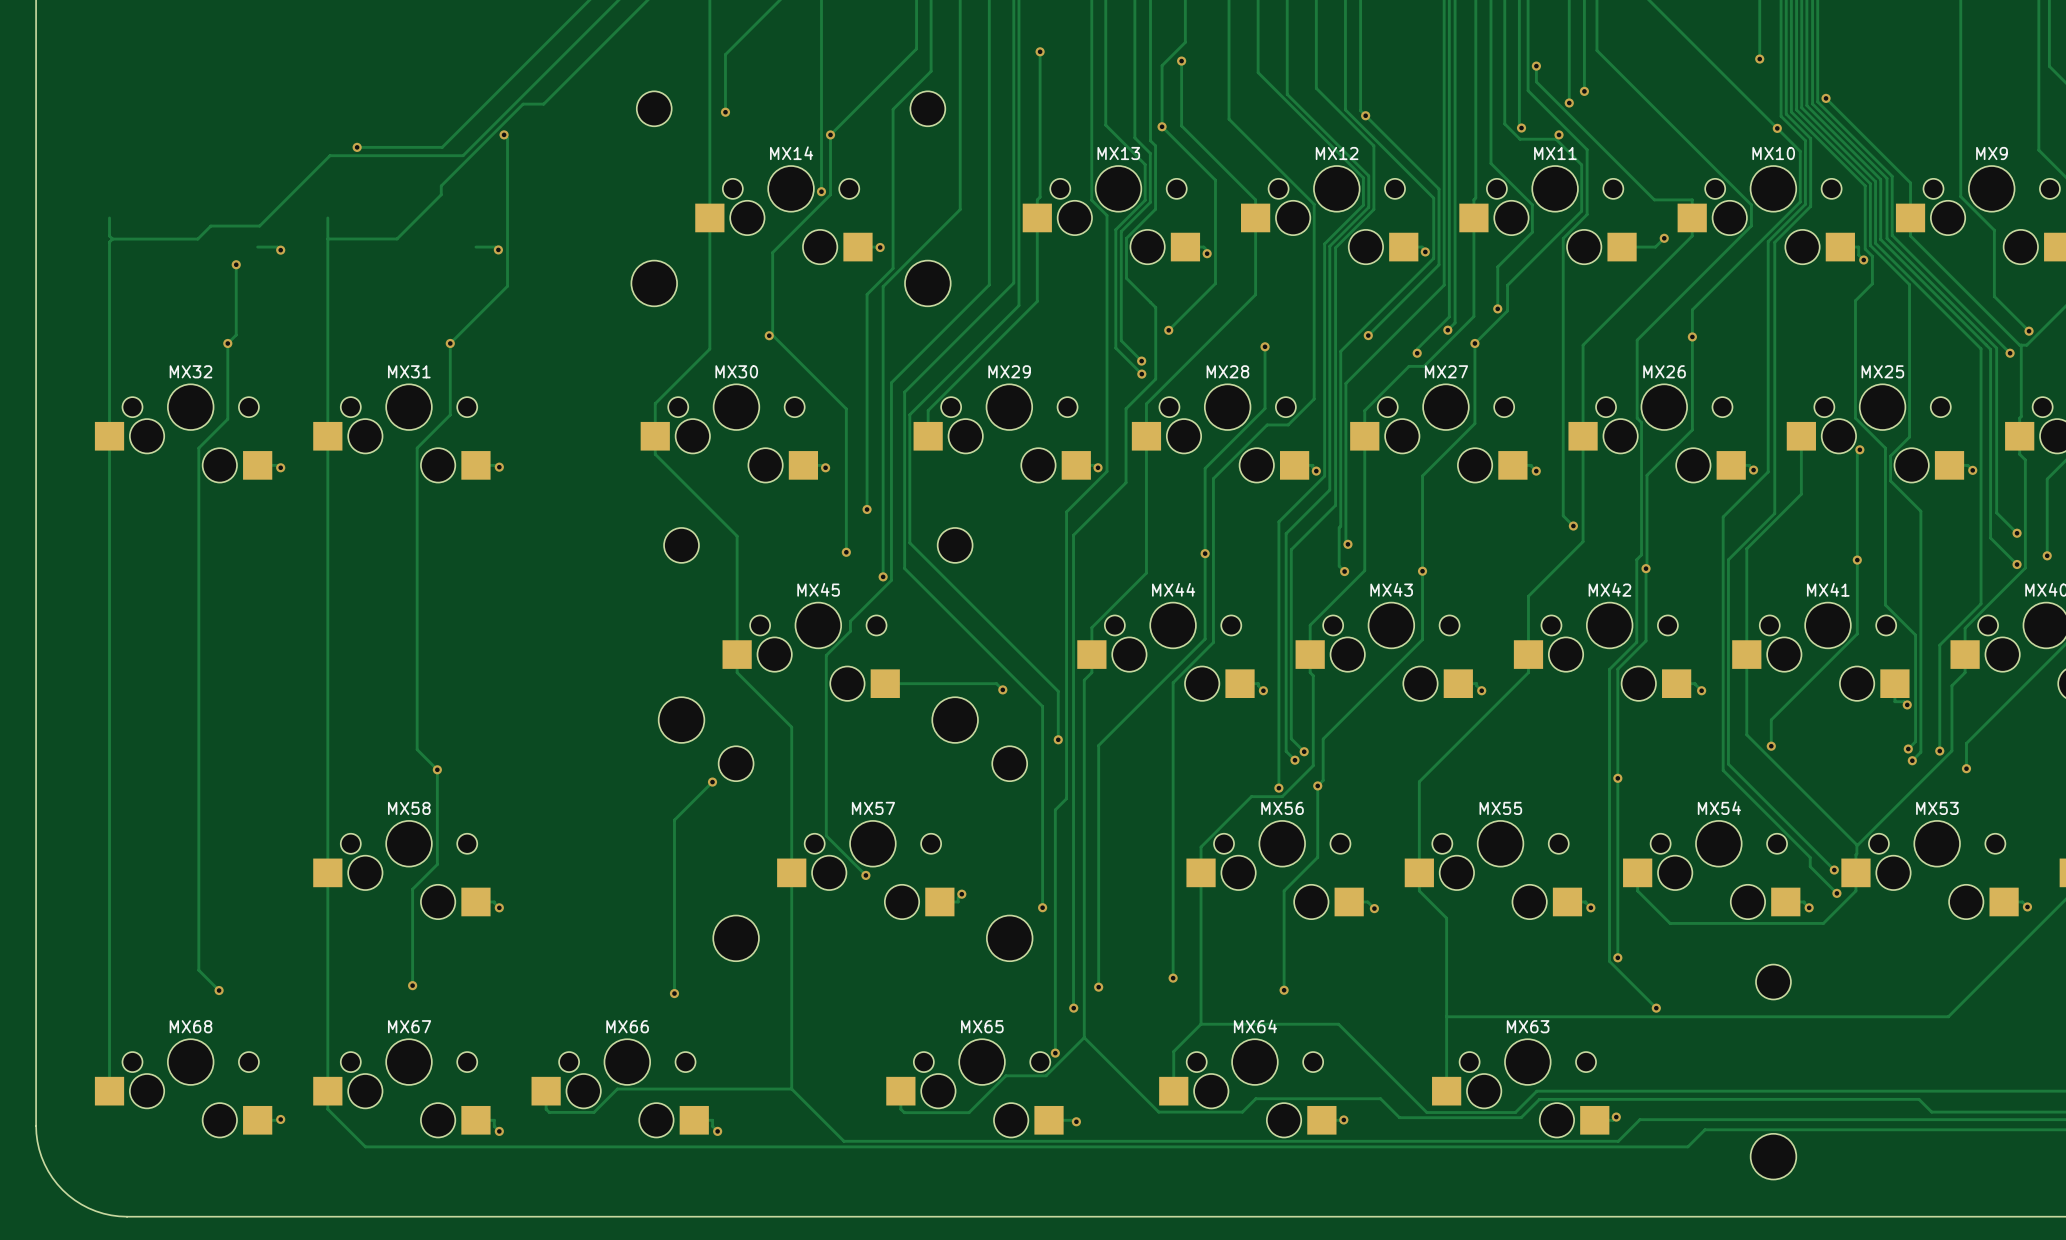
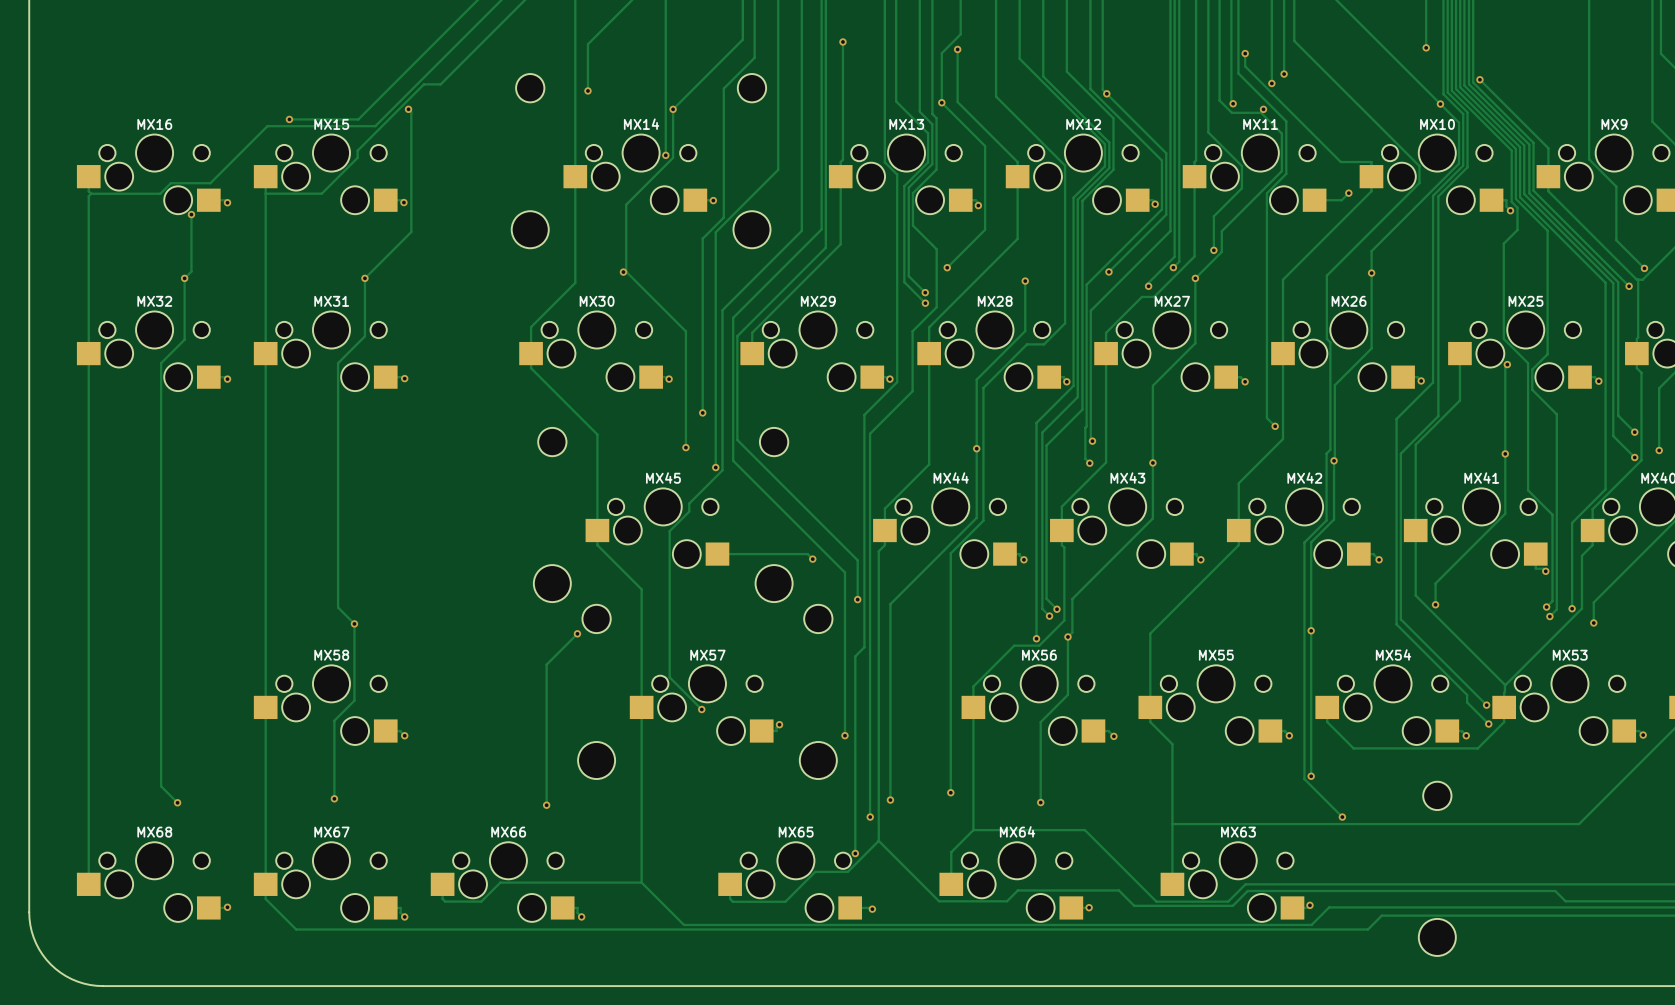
MX16: none -> (148, 174)
MX15: none -> (325, 174)

